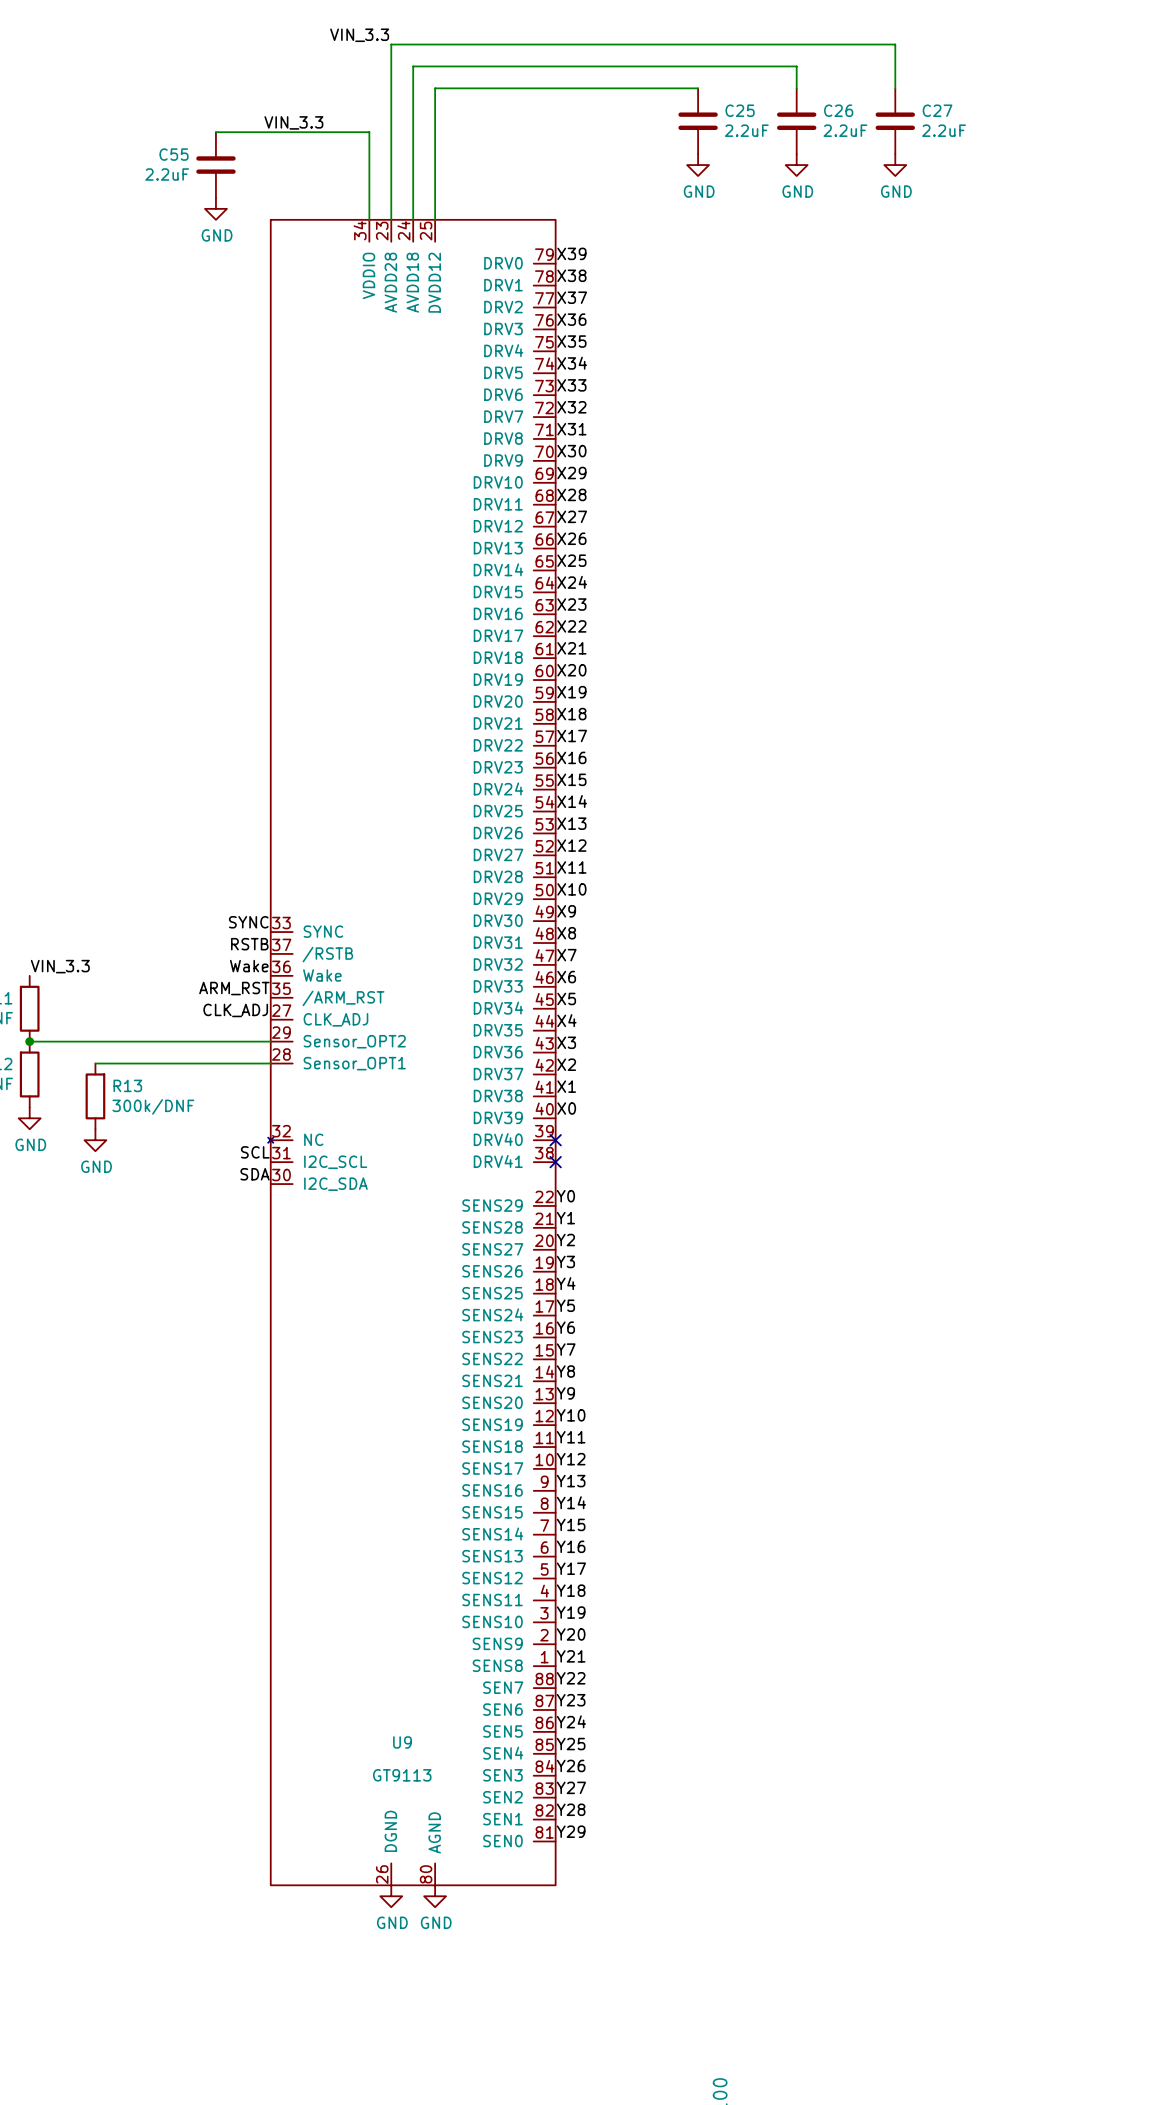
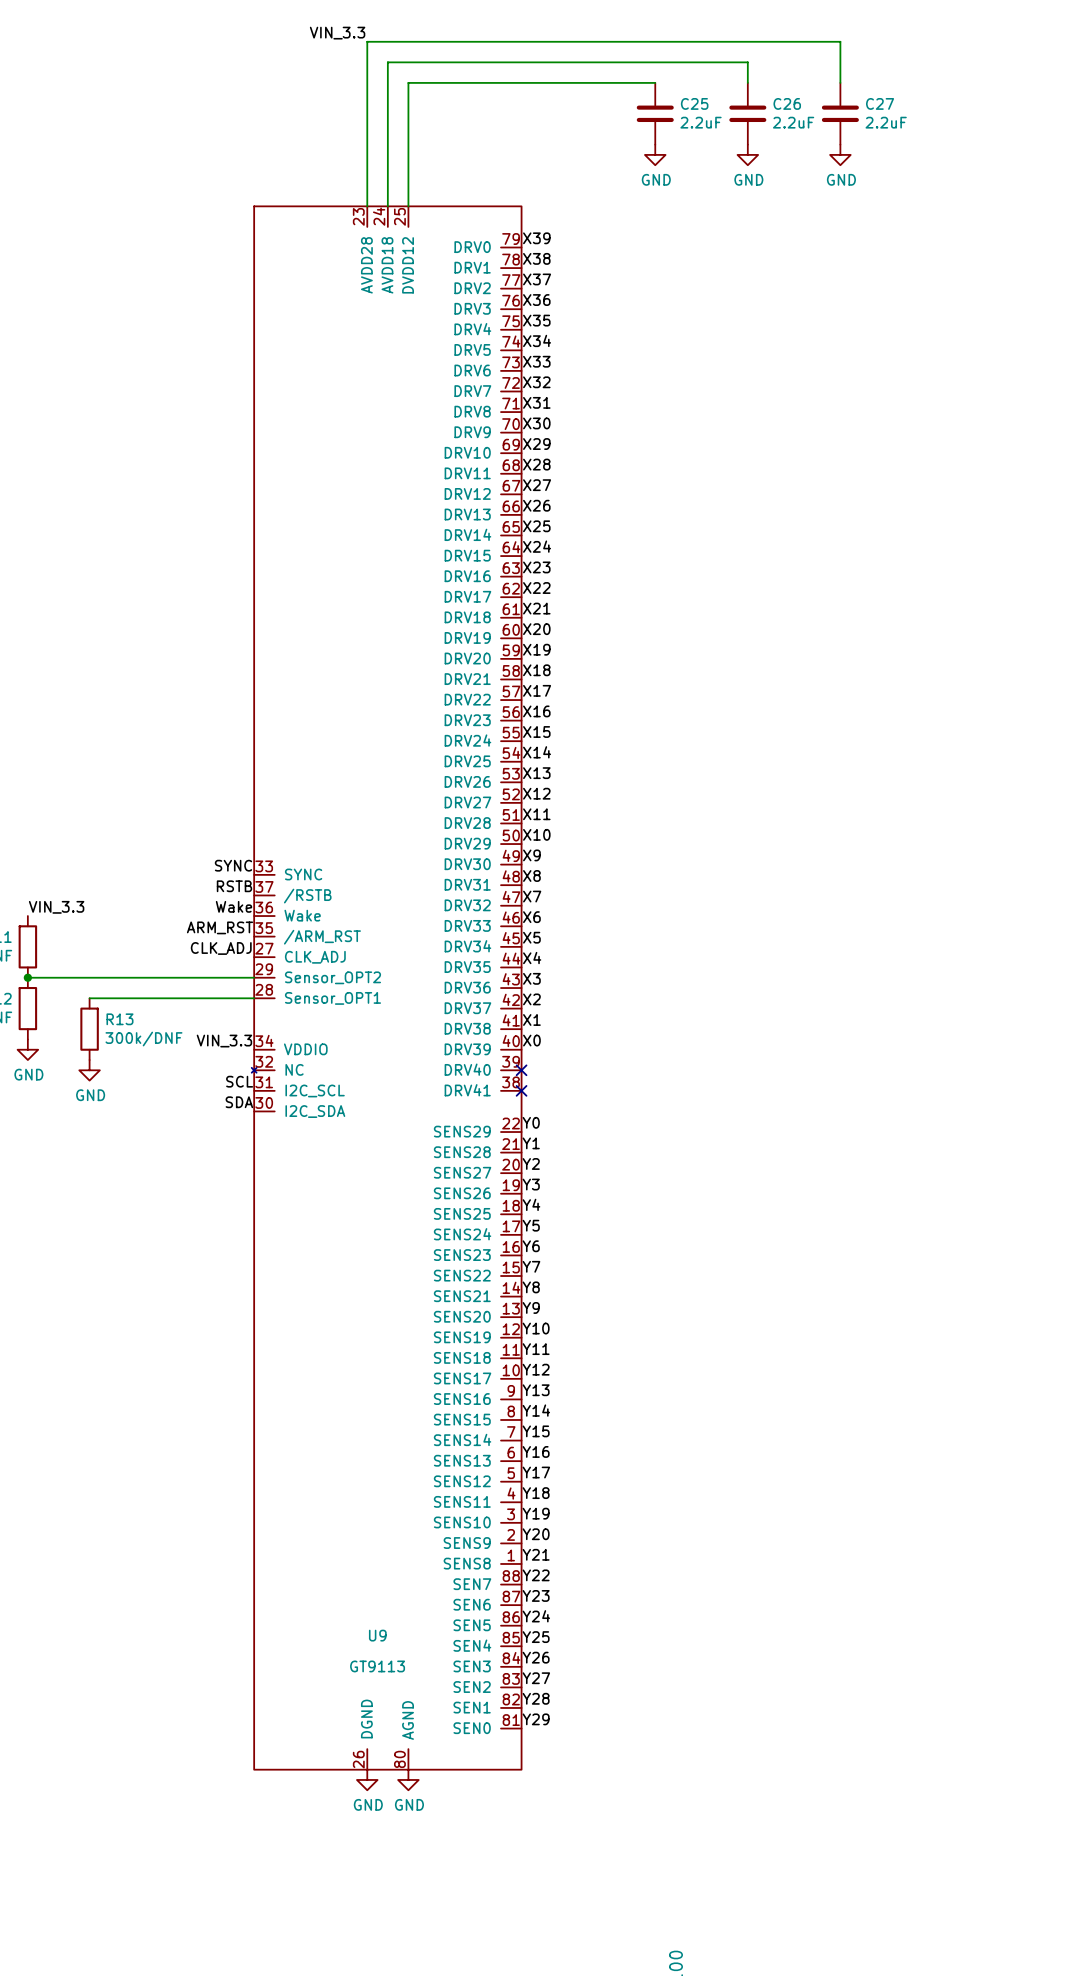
label: VIN_3.3 (293, 122) -> none
wire: (215, 132) (369, 132) (369, 219) -> none
C55: 2.2uF (215, 165) -> none
power symbol: GND (215, 208) -> none
U9 symbol: [268, 219, 556, 1886] -> [251, 206, 522, 1770]
label: none -> VIN_3.3 (224, 1041)

